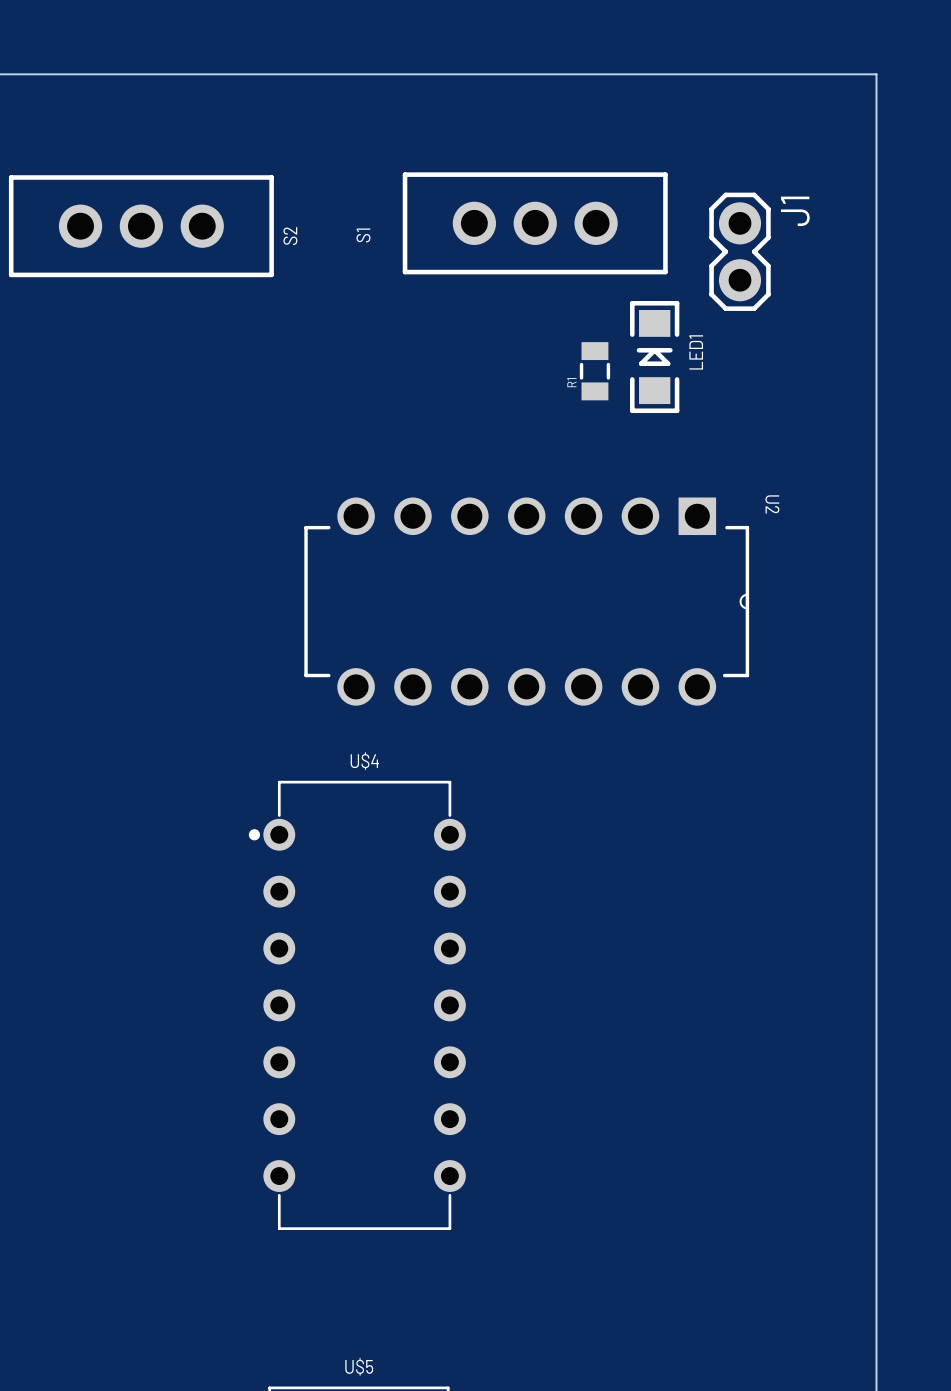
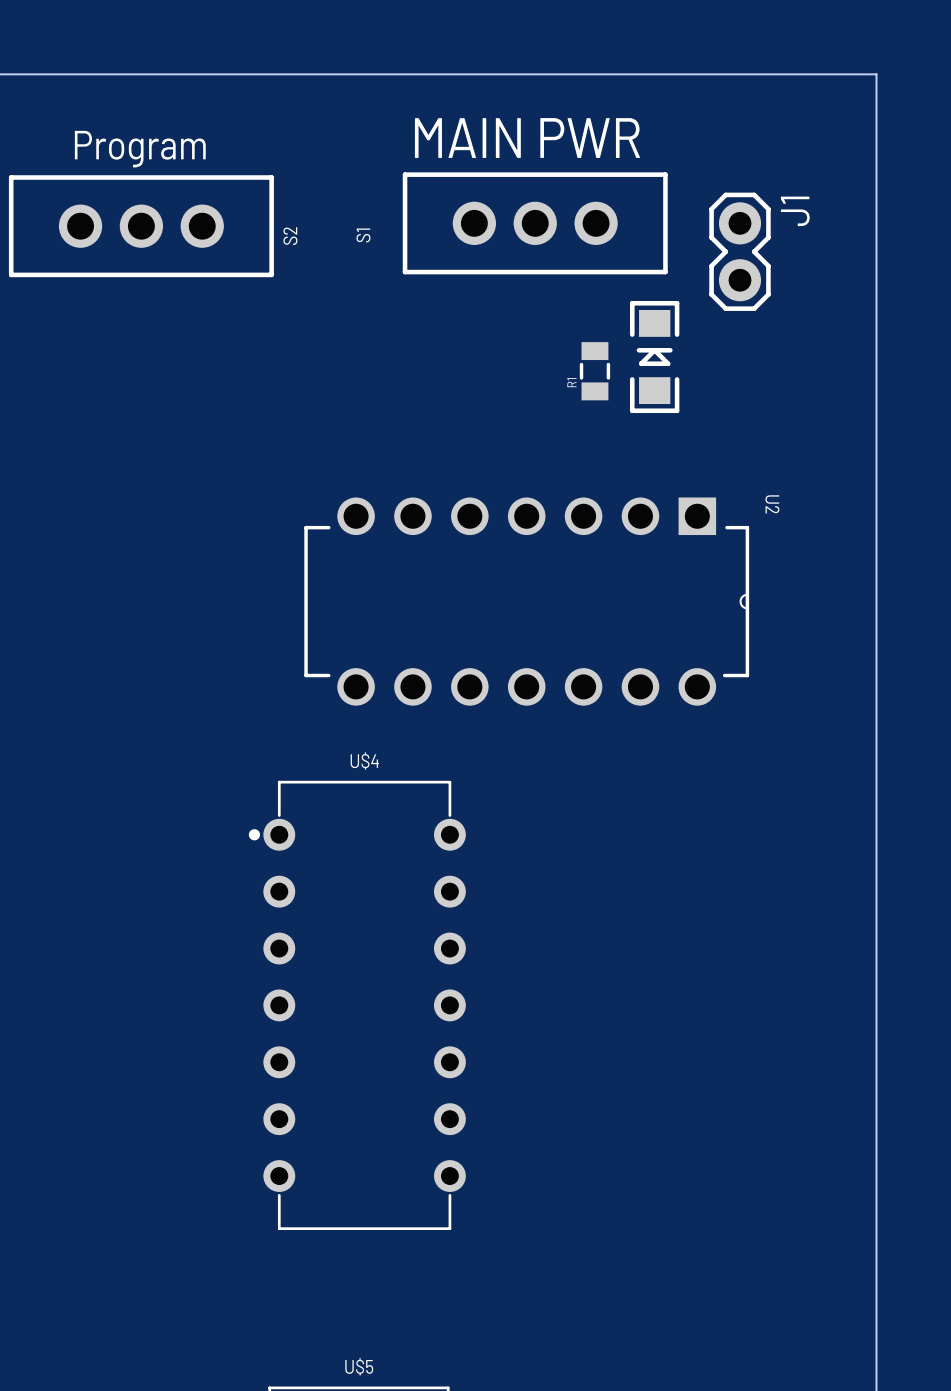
S1 value: none -> MAIN PWR (527, 138)
S2 value: none -> Program (140, 149)
LED1 name: LED1 (696, 352) -> none

